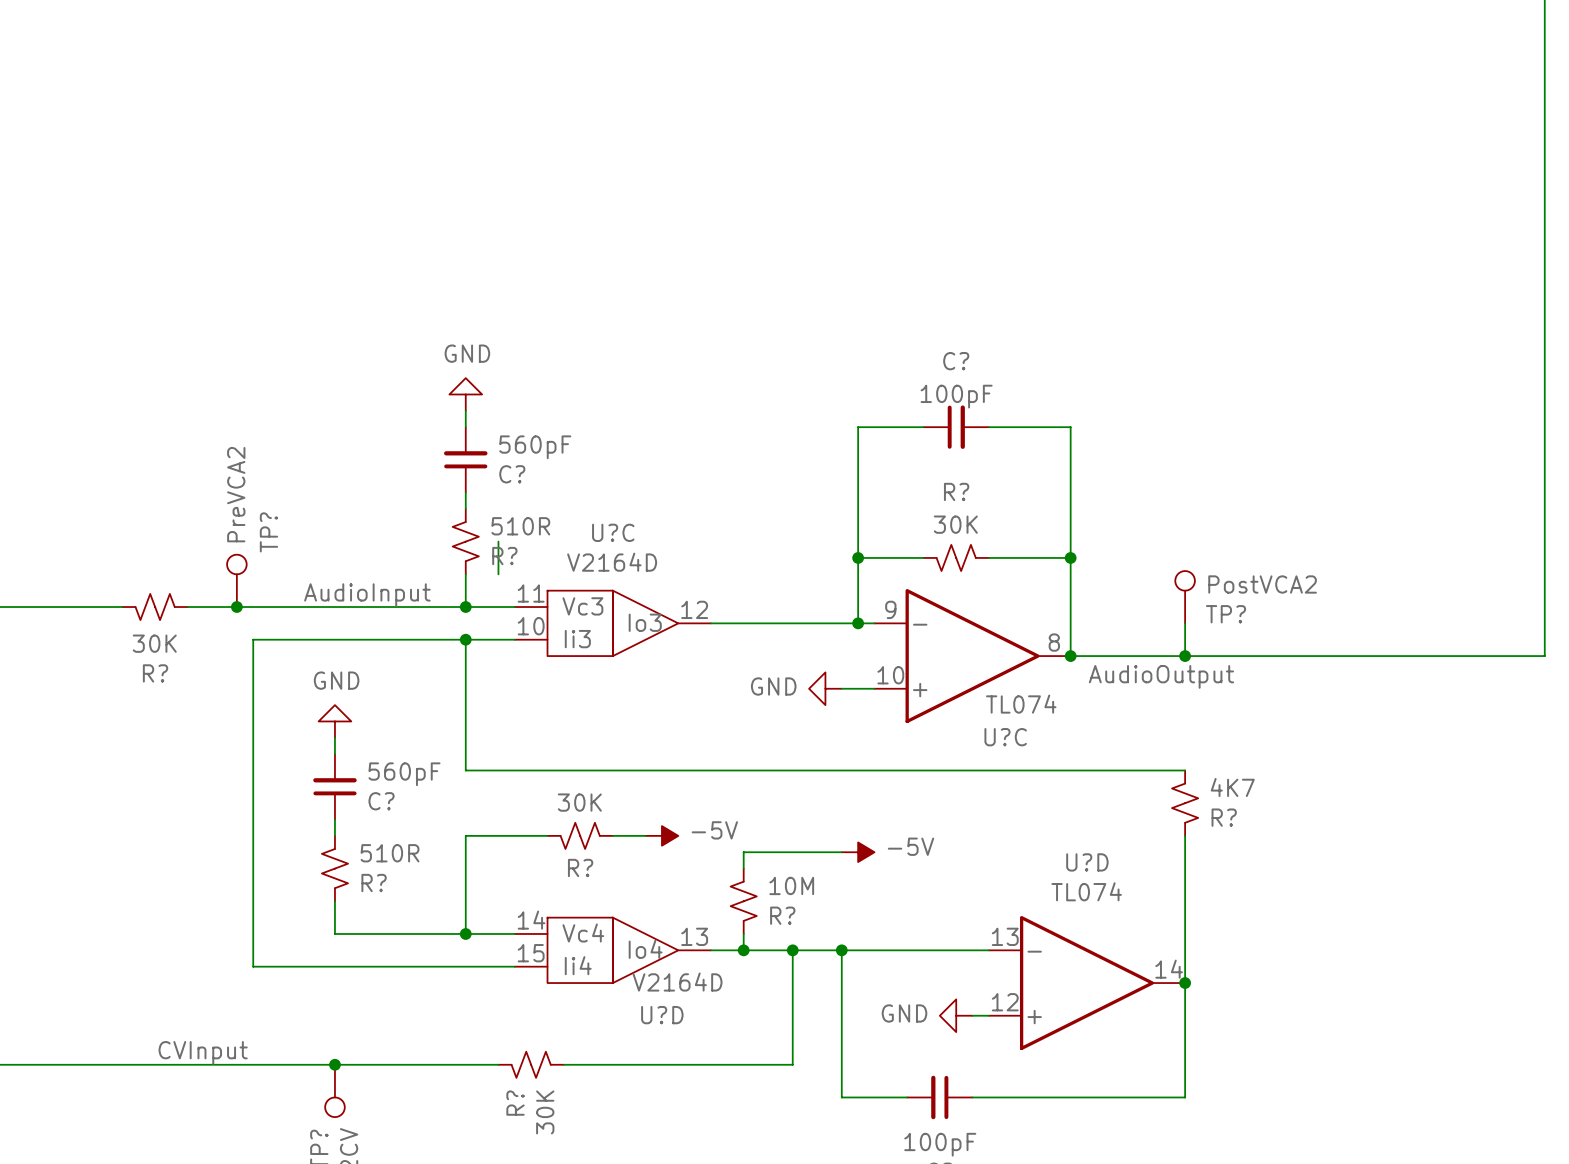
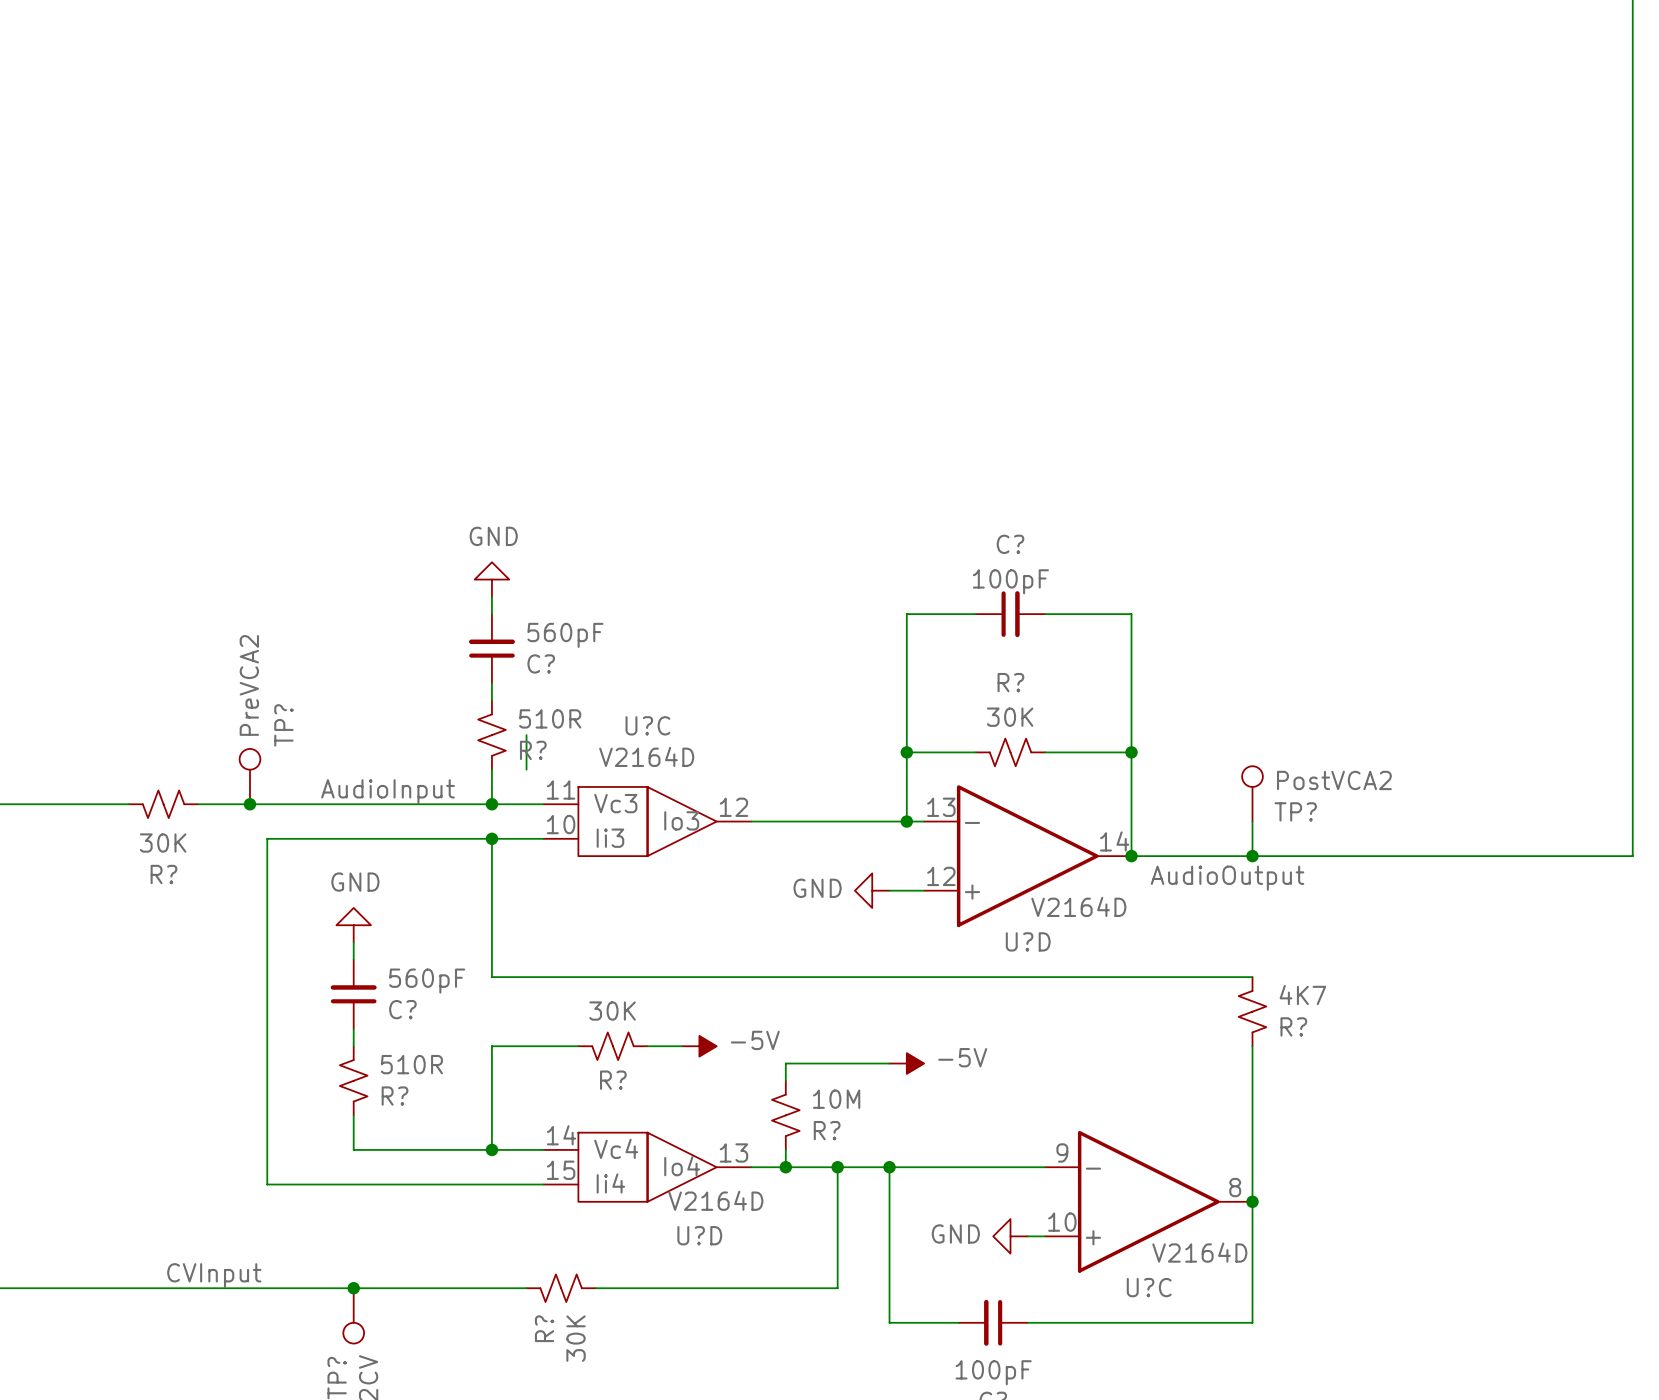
U?C pin number: 9 (890, 609) -> 13 (941, 807)
U?C pin number: 8 (1054, 642) -> 14 (1114, 841)
U?C pin number: 10 (890, 675) -> 12 (941, 876)
U?C value: TL074 (1021, 704) -> V2164D (1078, 906)
U?C name: U?C (1005, 737) -> U?D (1028, 941)
U?D name: U?D (1087, 862) -> U?C (1149, 1287)
U?D value: TL074 (1086, 891) -> V2164D (1199, 1252)
U?D pin number: 13 (1005, 936) -> 9 (1062, 1152)
U?D pin number: 14 (1169, 969) -> 8 (1235, 1187)
U?D pin number: 12 (1005, 1002) -> 10 (1062, 1222)

